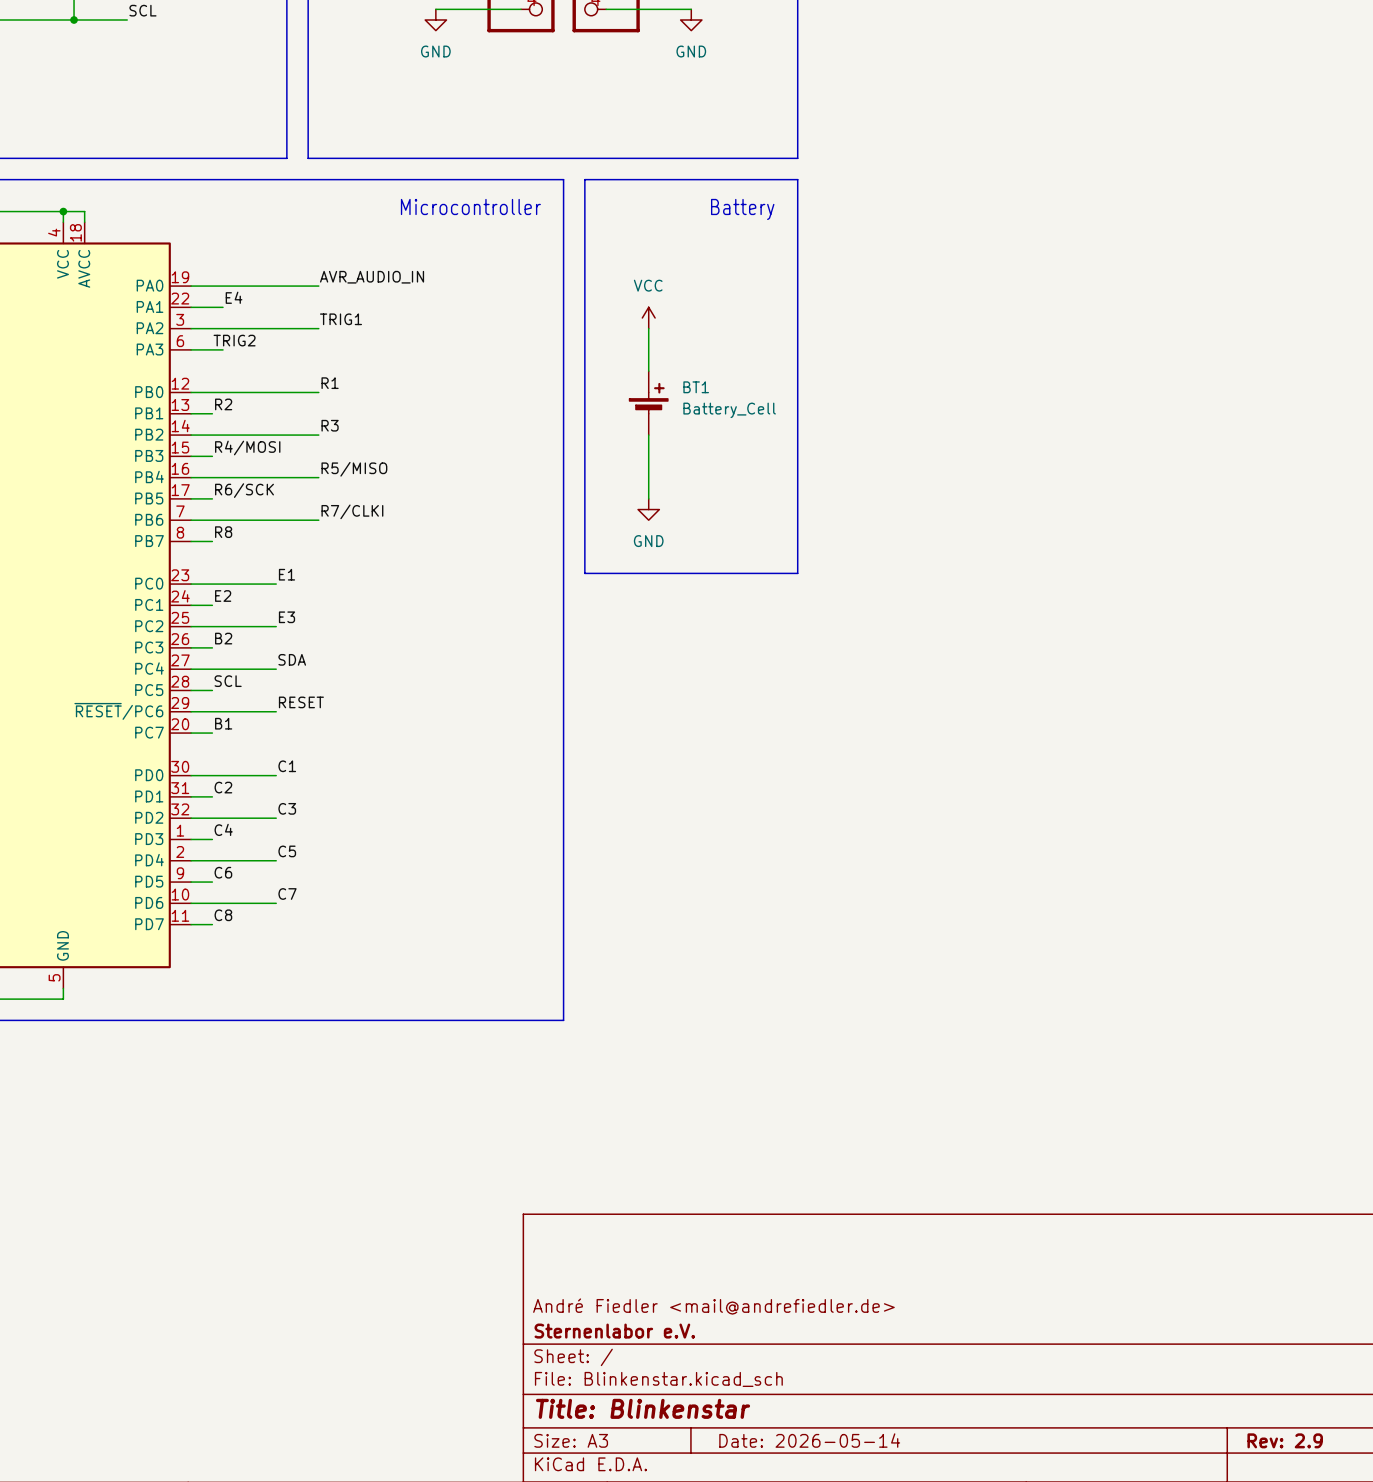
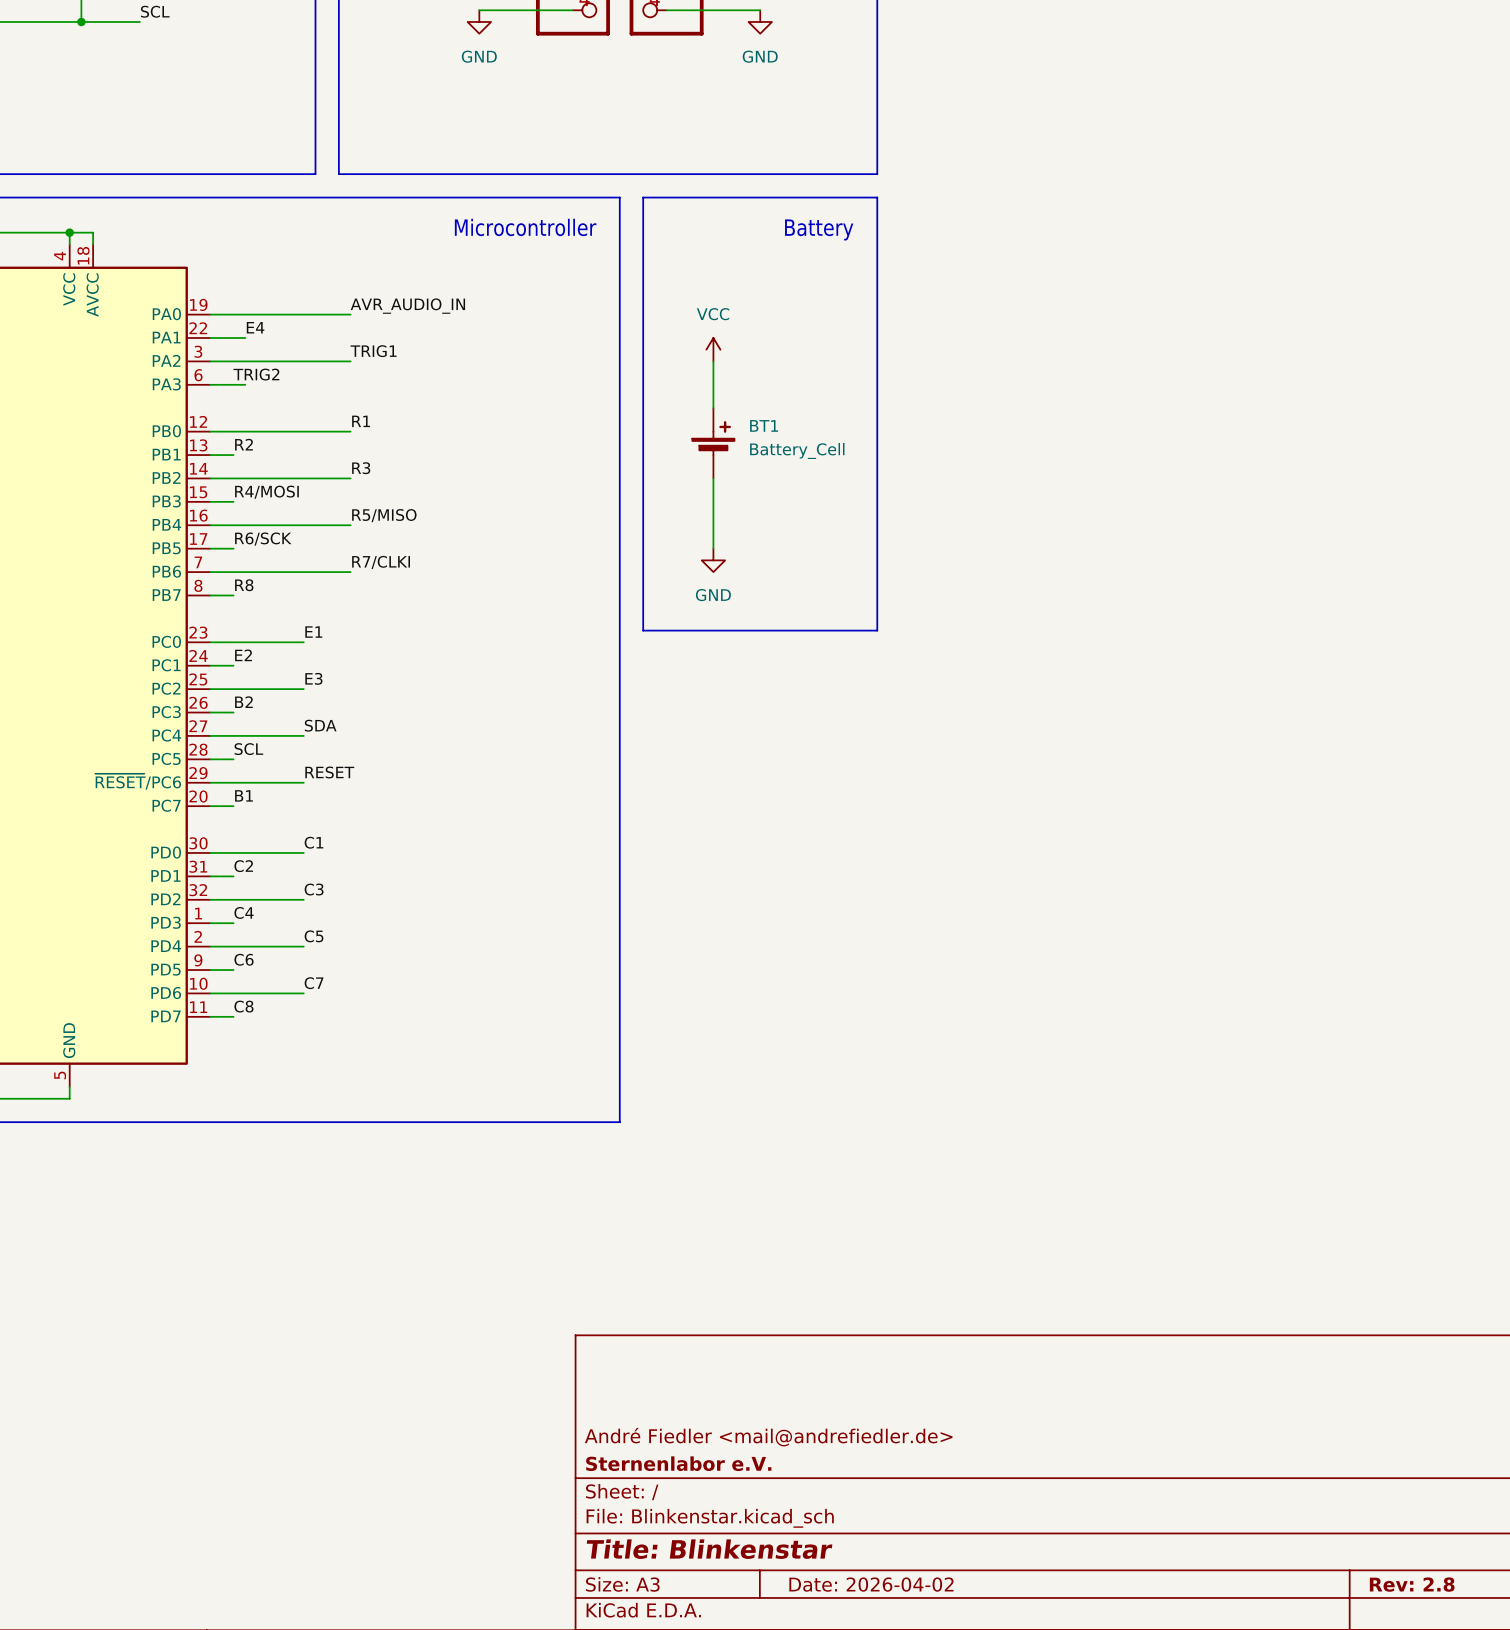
title block: Date: 2026-05-14 (809, 1440) -> Date: 2026-04-02 (871, 1584)
title block: Rev: 2.9 (1285, 1440) -> Rev: 2.8 (1412, 1584)

